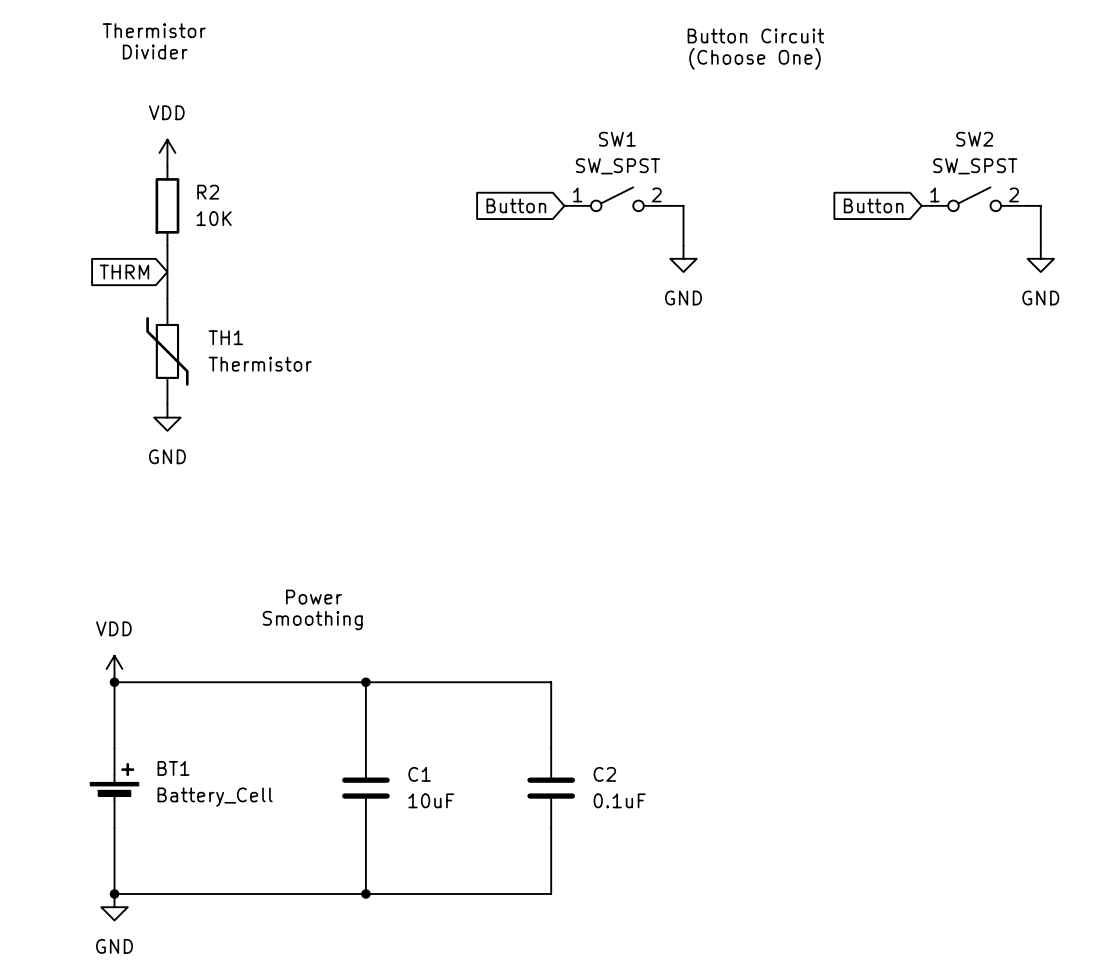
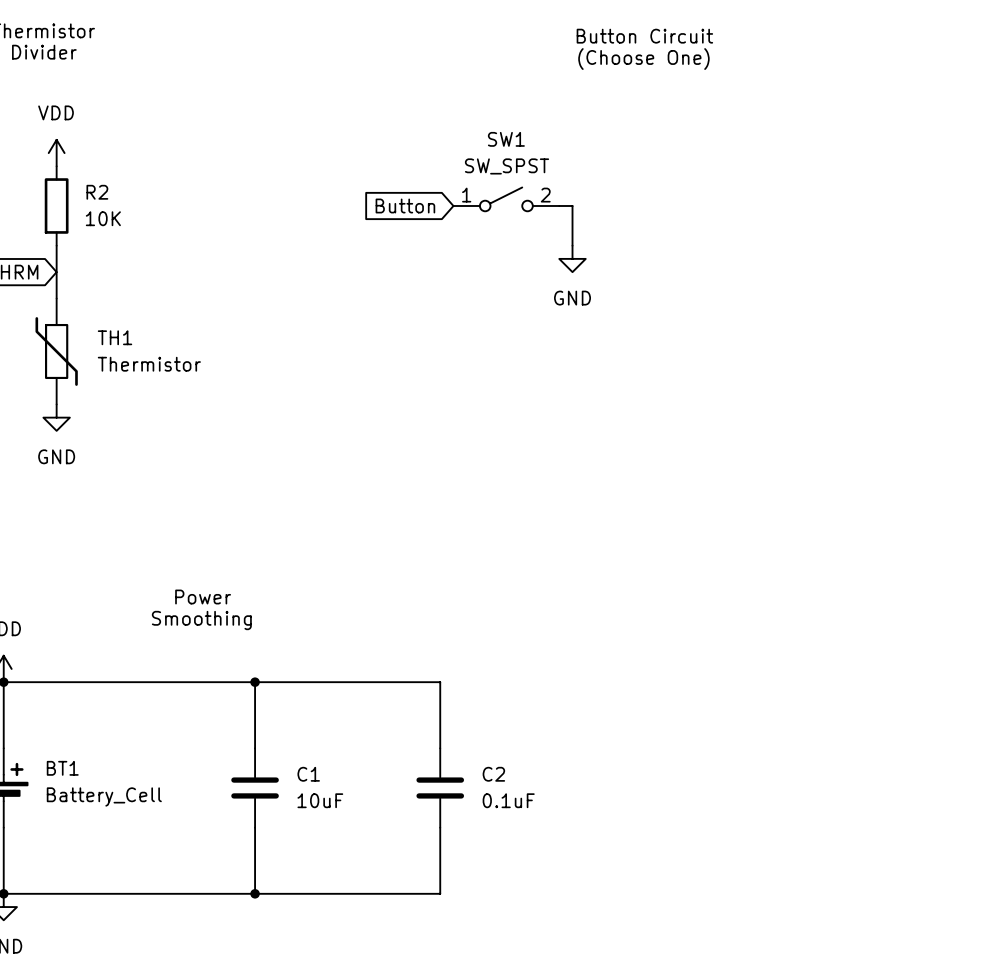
SW2: SW_SPST (974, 199) -> none
global label: Button (873, 205) -> none
wire: (1027, 205) (1040, 205) (1040, 245) -> none
power symbol: GND (1040, 258) -> none

